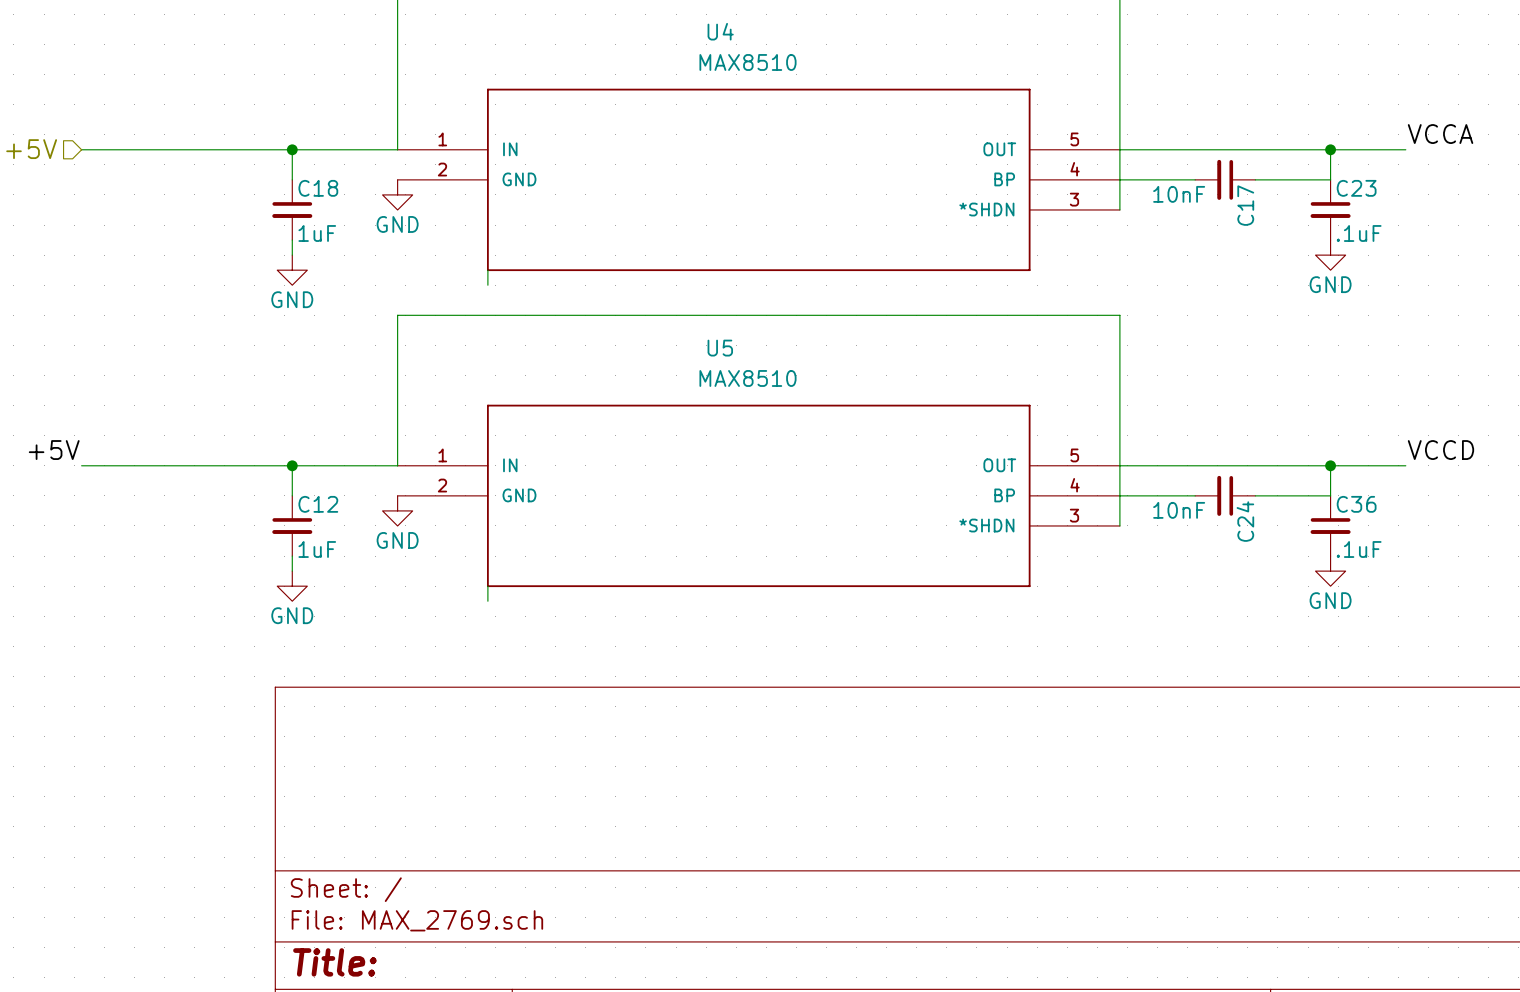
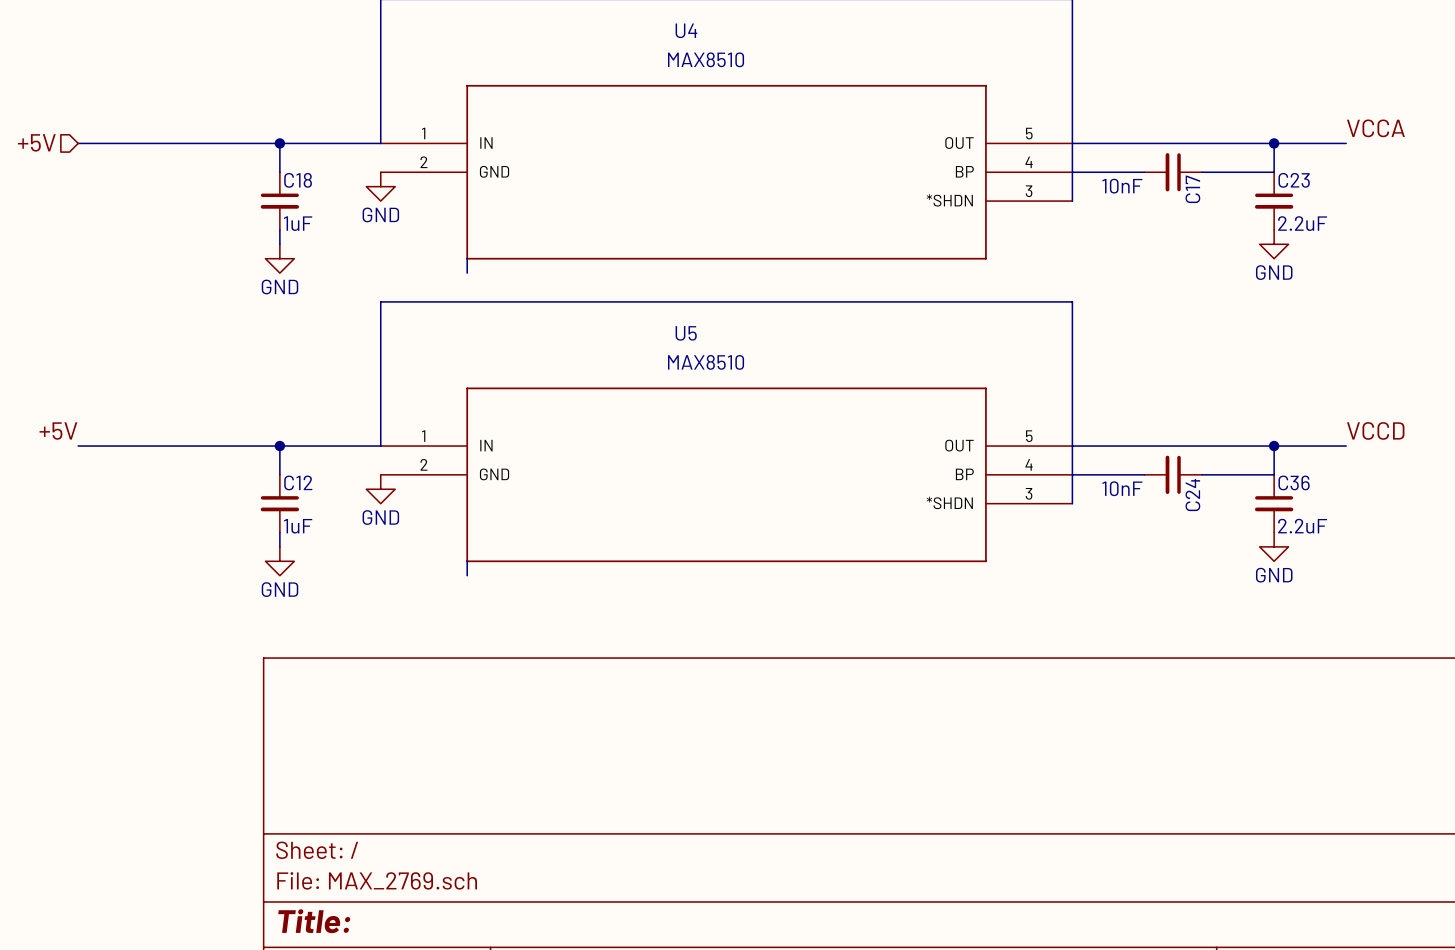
C23 value: .1uF (1359, 233) -> 2.2uF (1302, 223)
C36 value: .1uF (1359, 549) -> 2.2uF (1302, 526)

